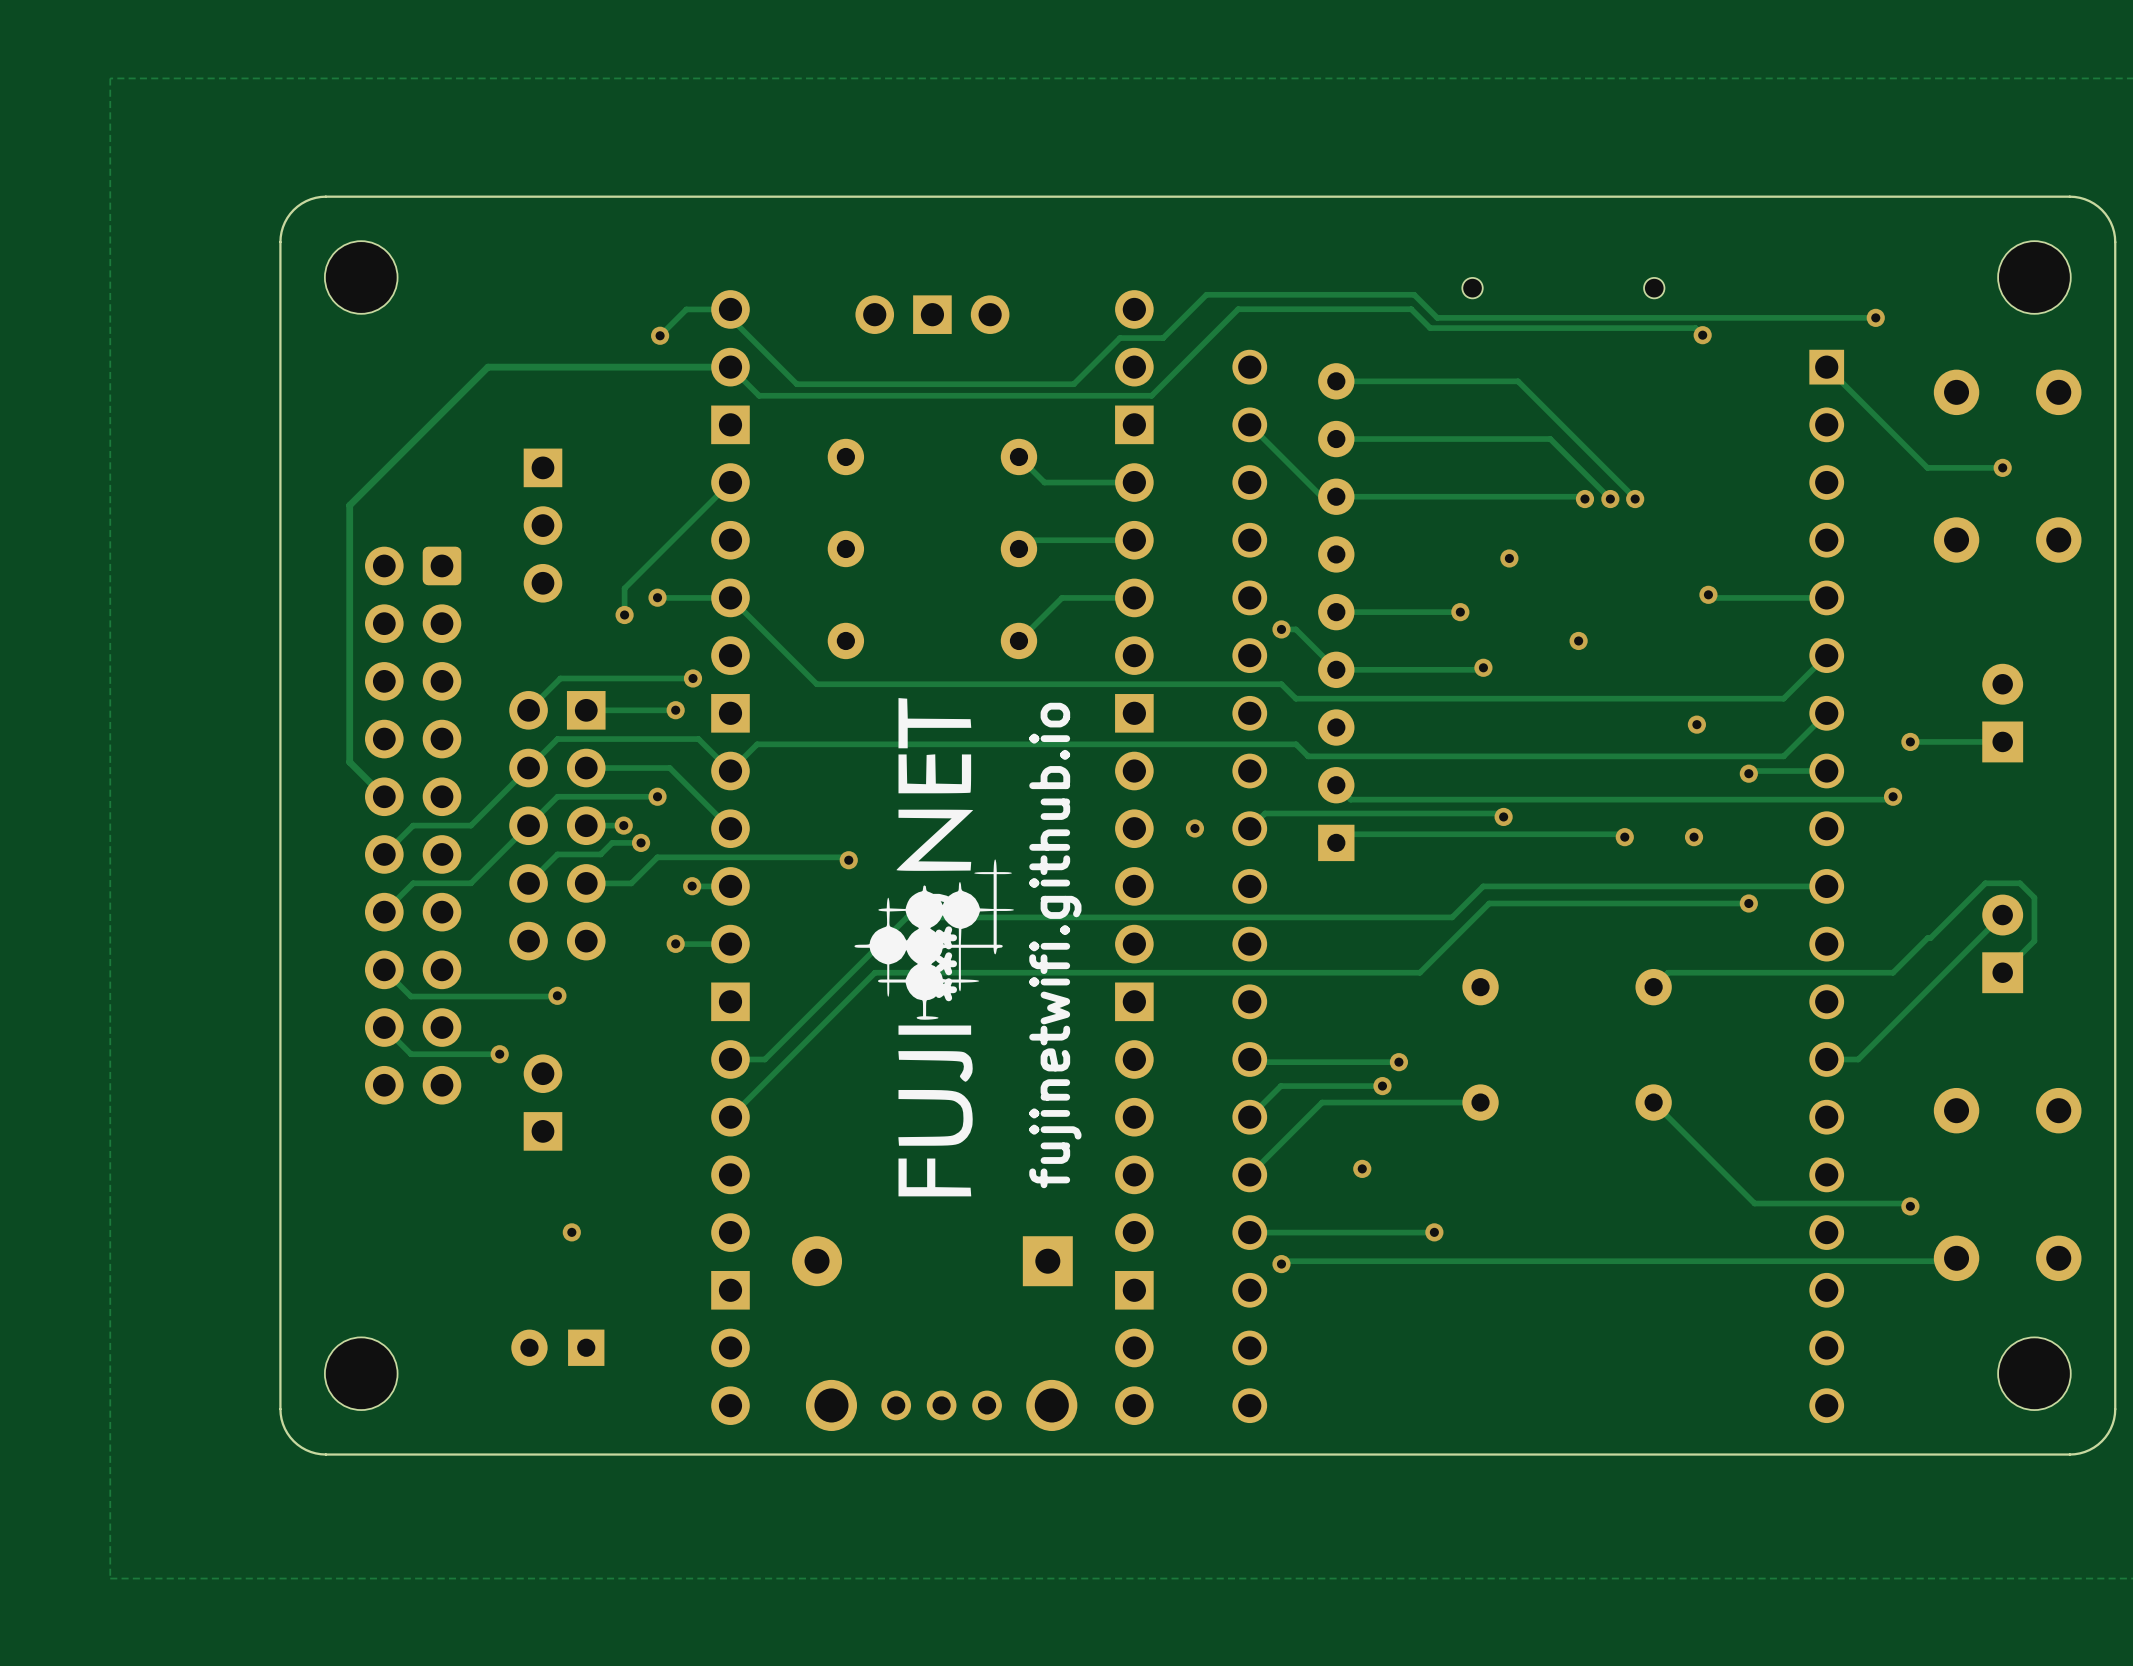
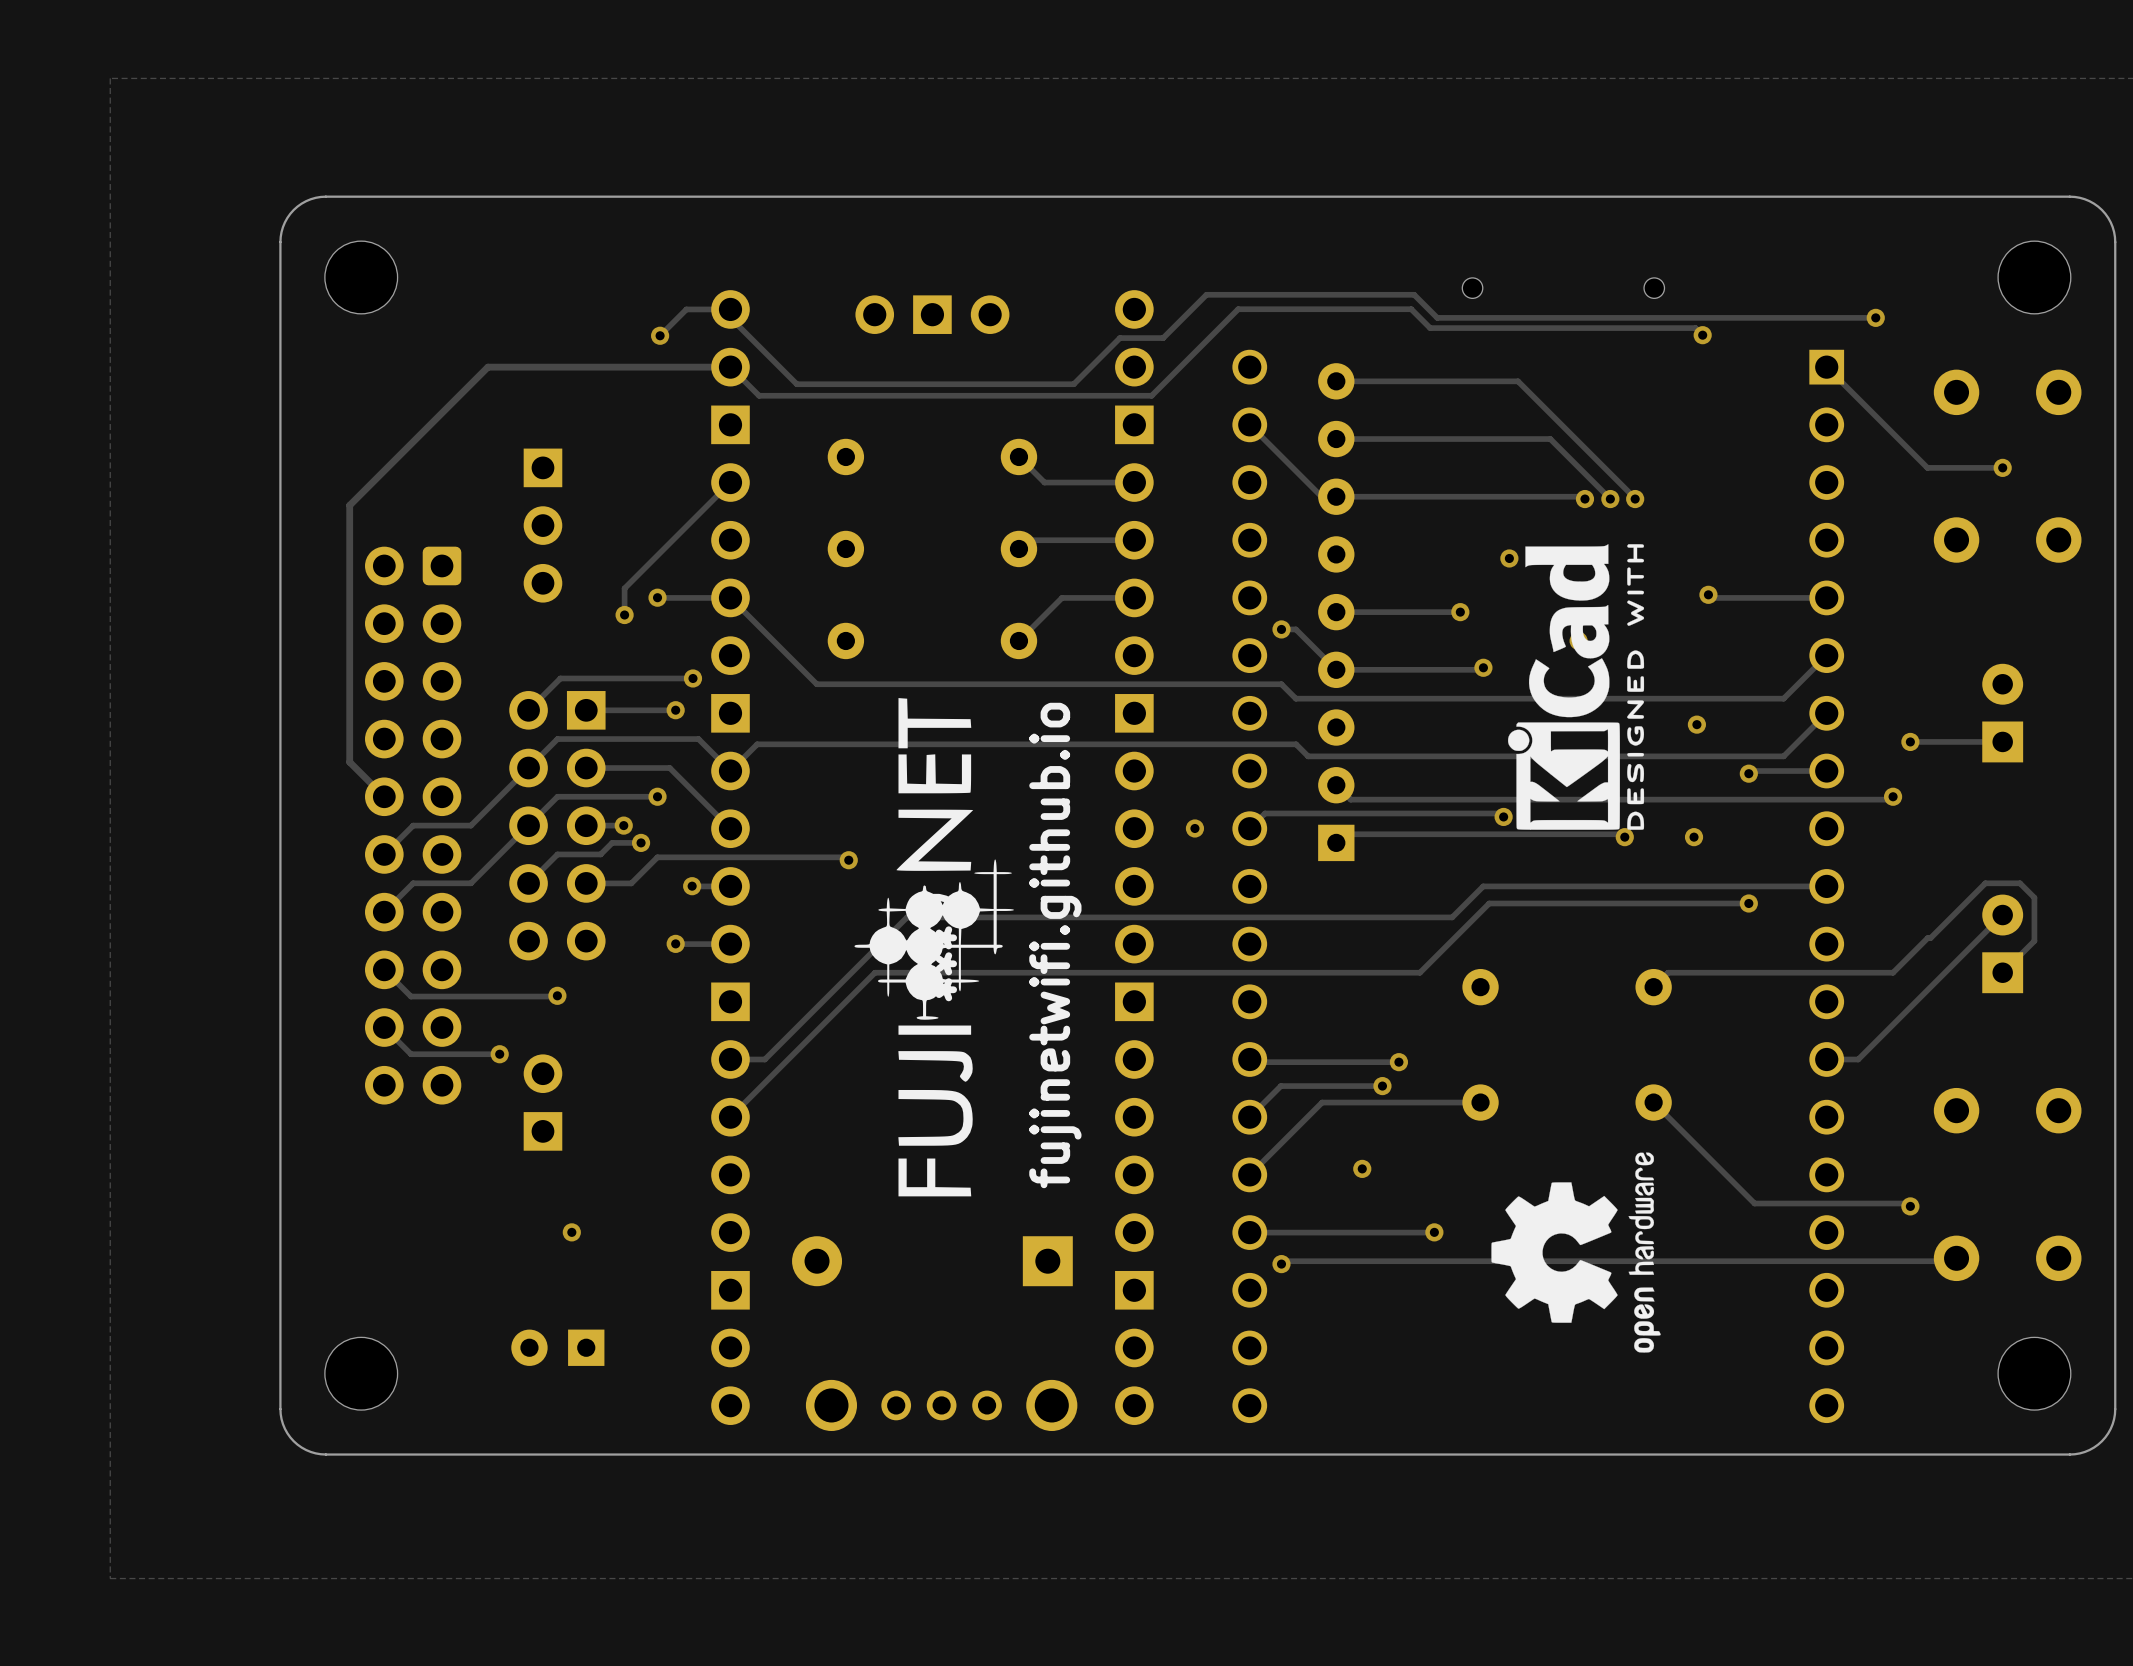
drawing: none -> [1508, 544, 1645, 830]
drawing: none -> [1491, 1152, 1661, 1353]

